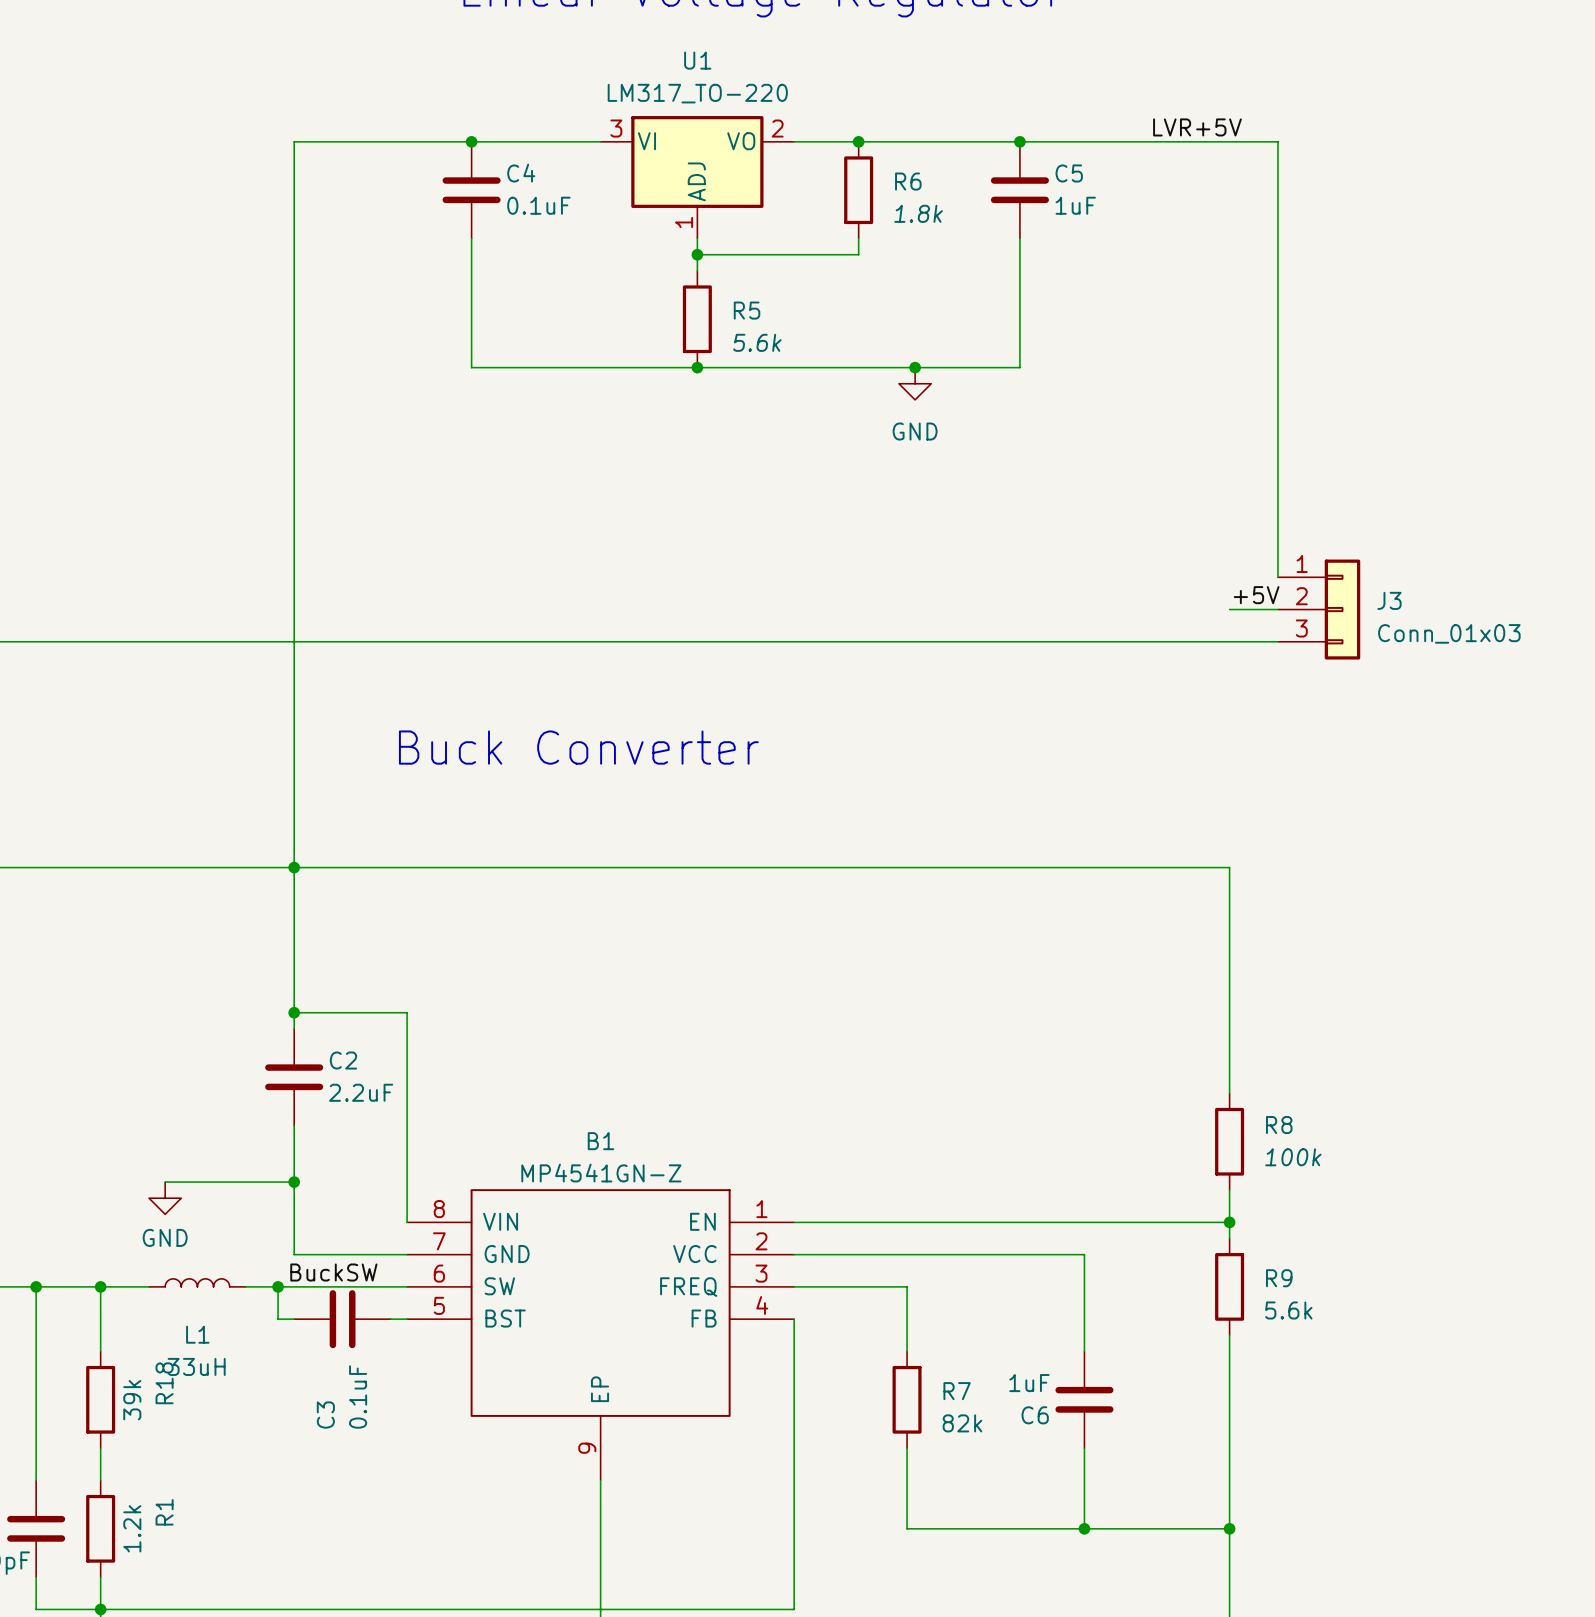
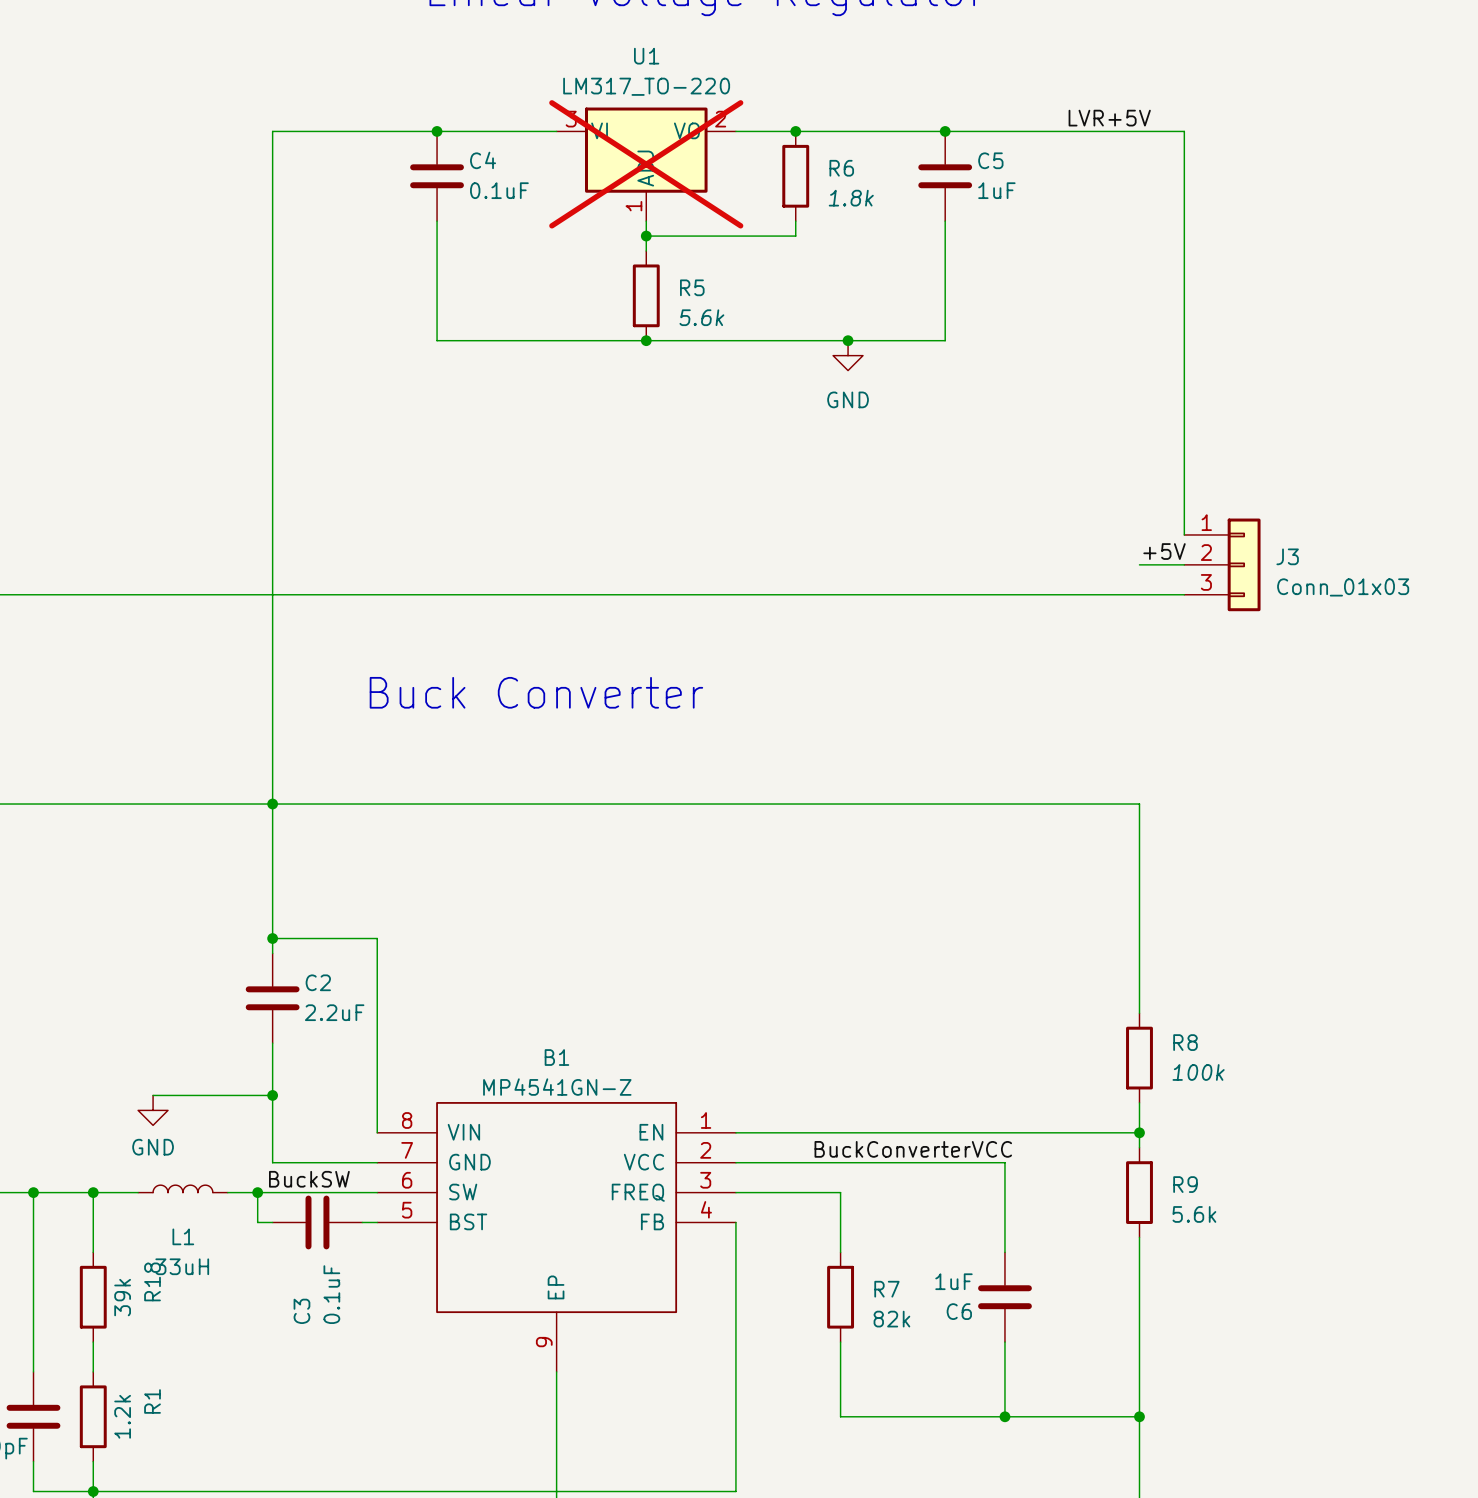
U1 do-not-place cross: none -> (646, 164)
label: none -> BuckConverterVCC (913, 1149)

